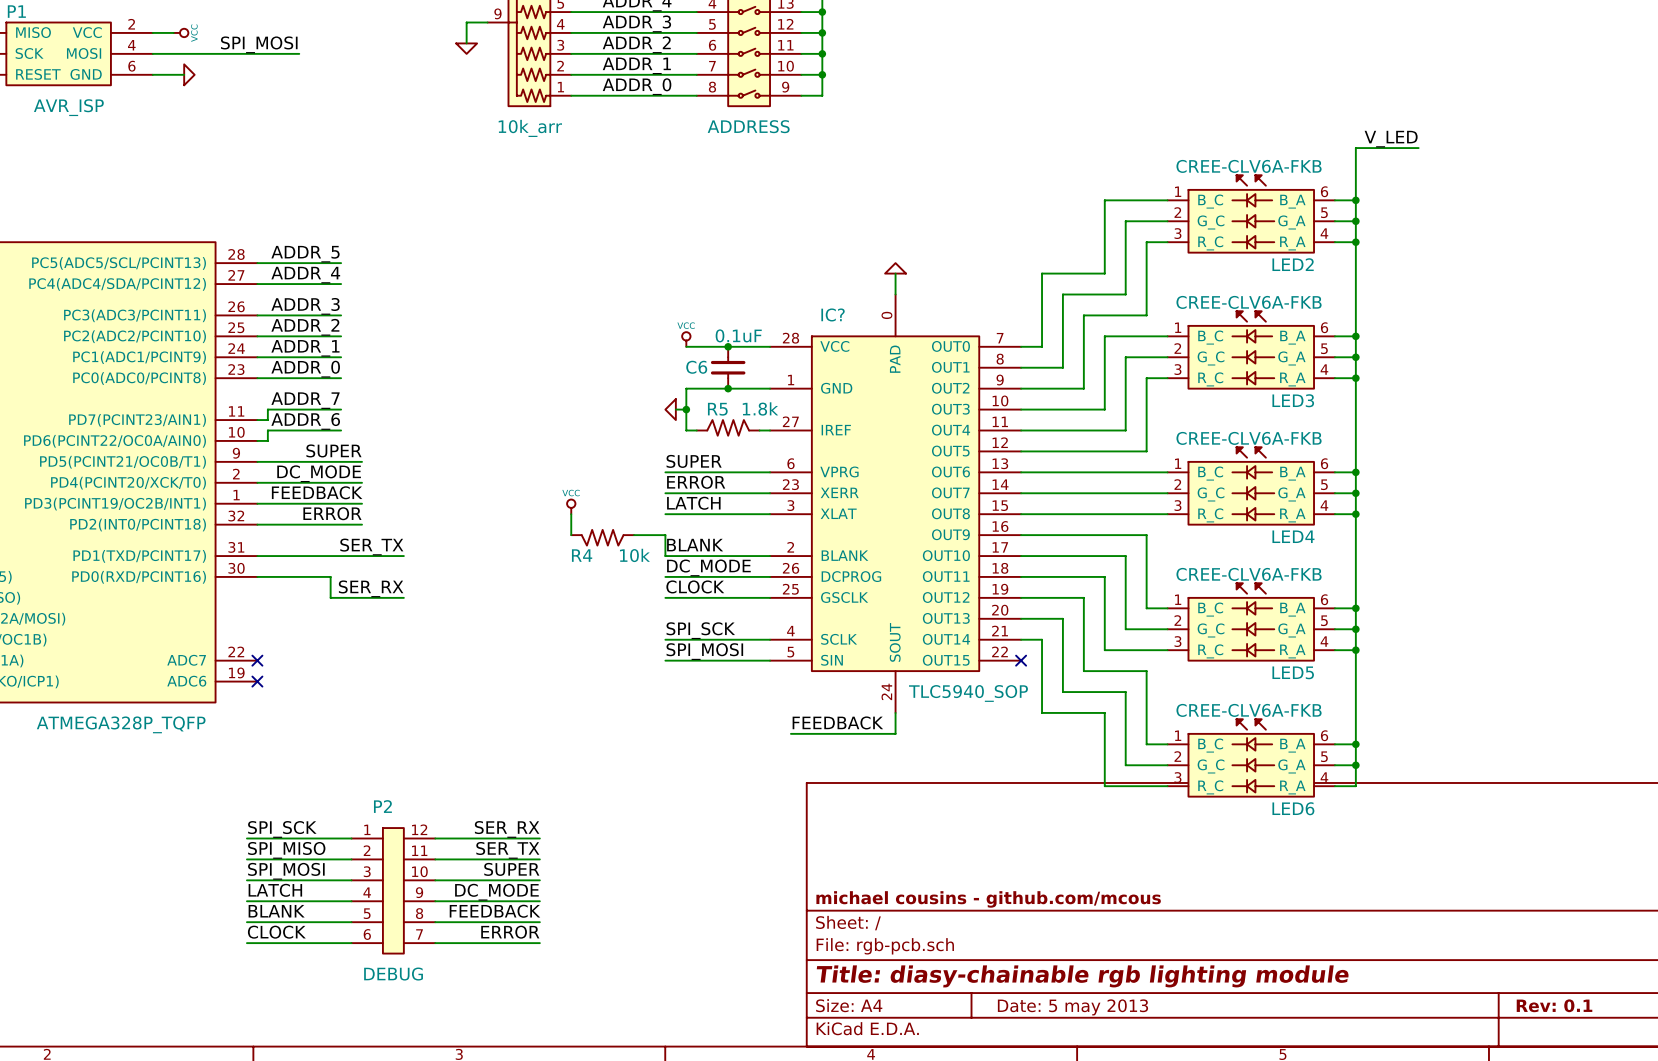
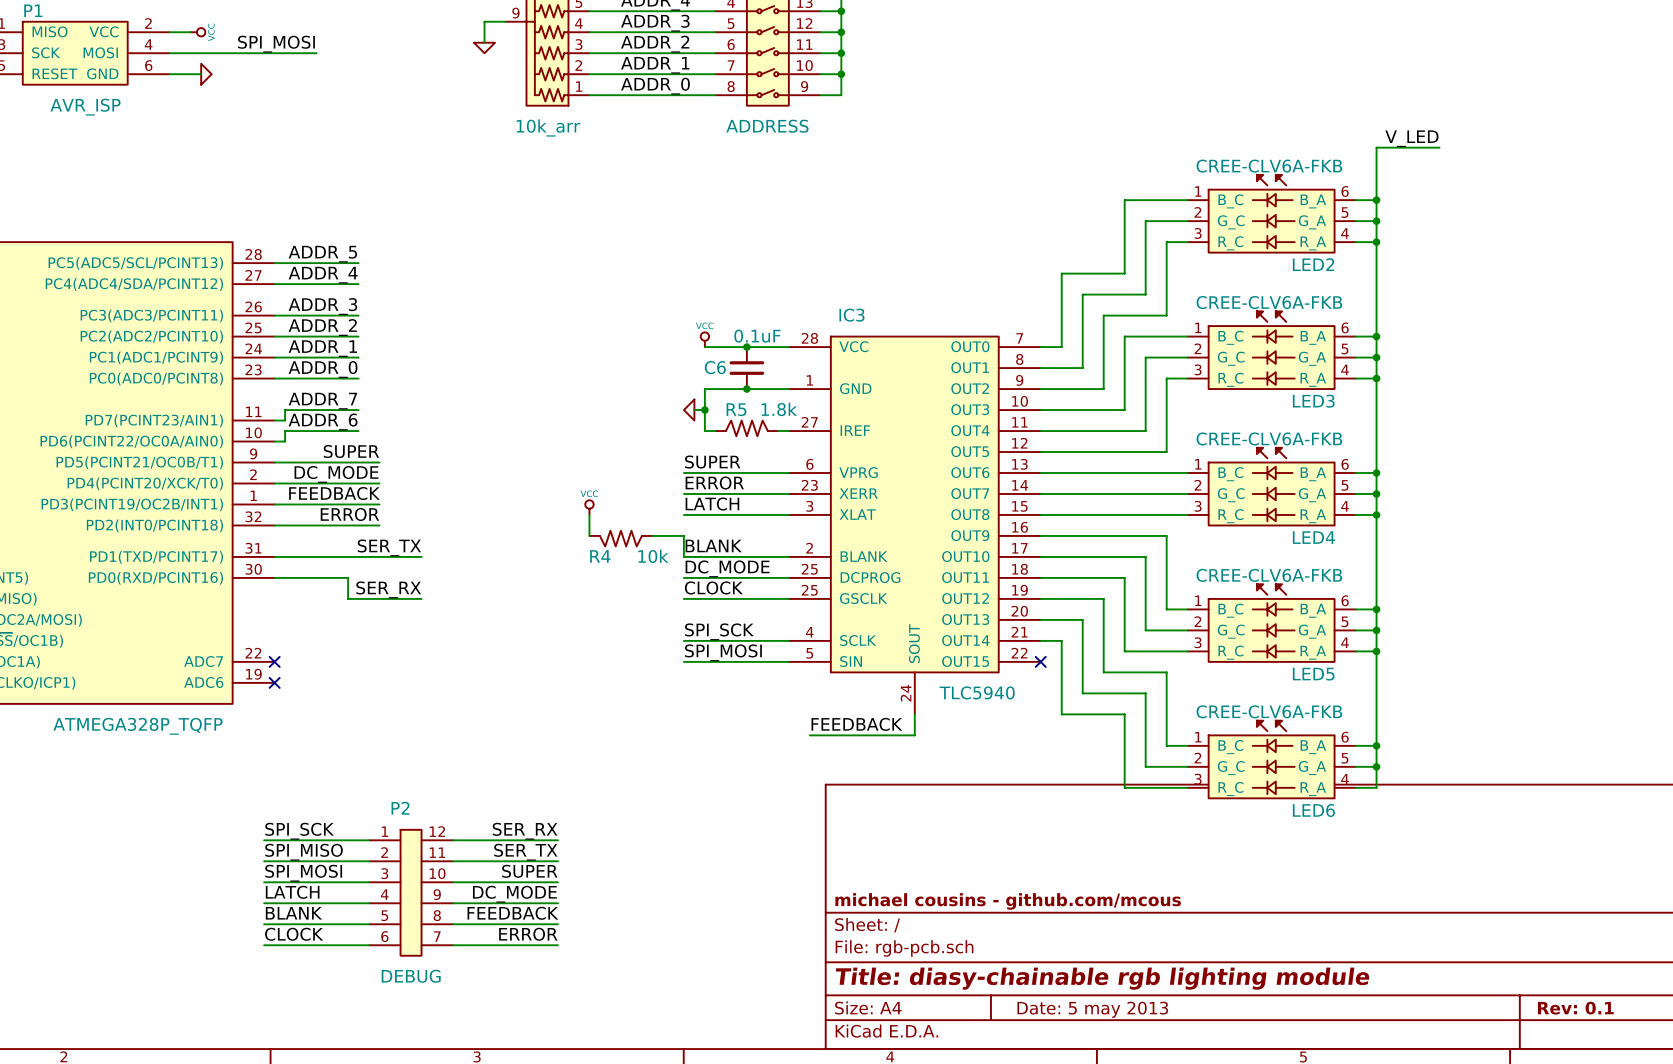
power symbol: (895, 268) -> none
wire: (895, 273) (895, 294) -> none
IC?: TLC5940_SOP (895, 503) -> none
IC3: none -> TLC5940 (914, 525)

